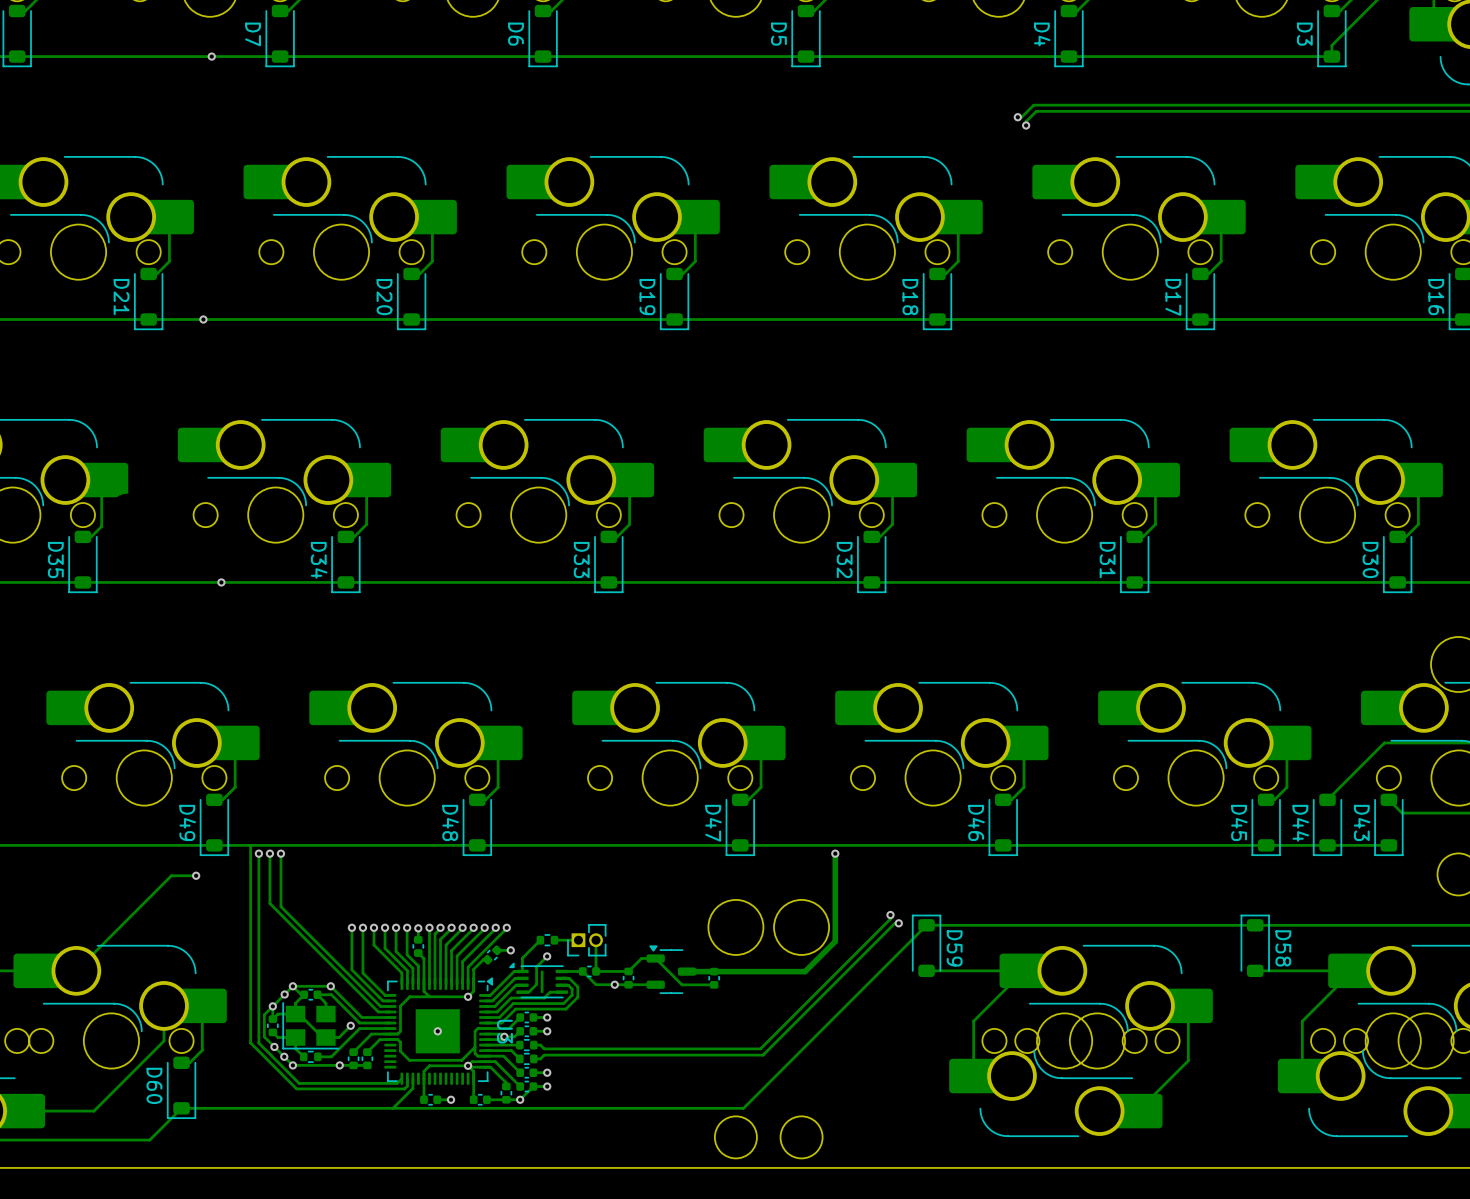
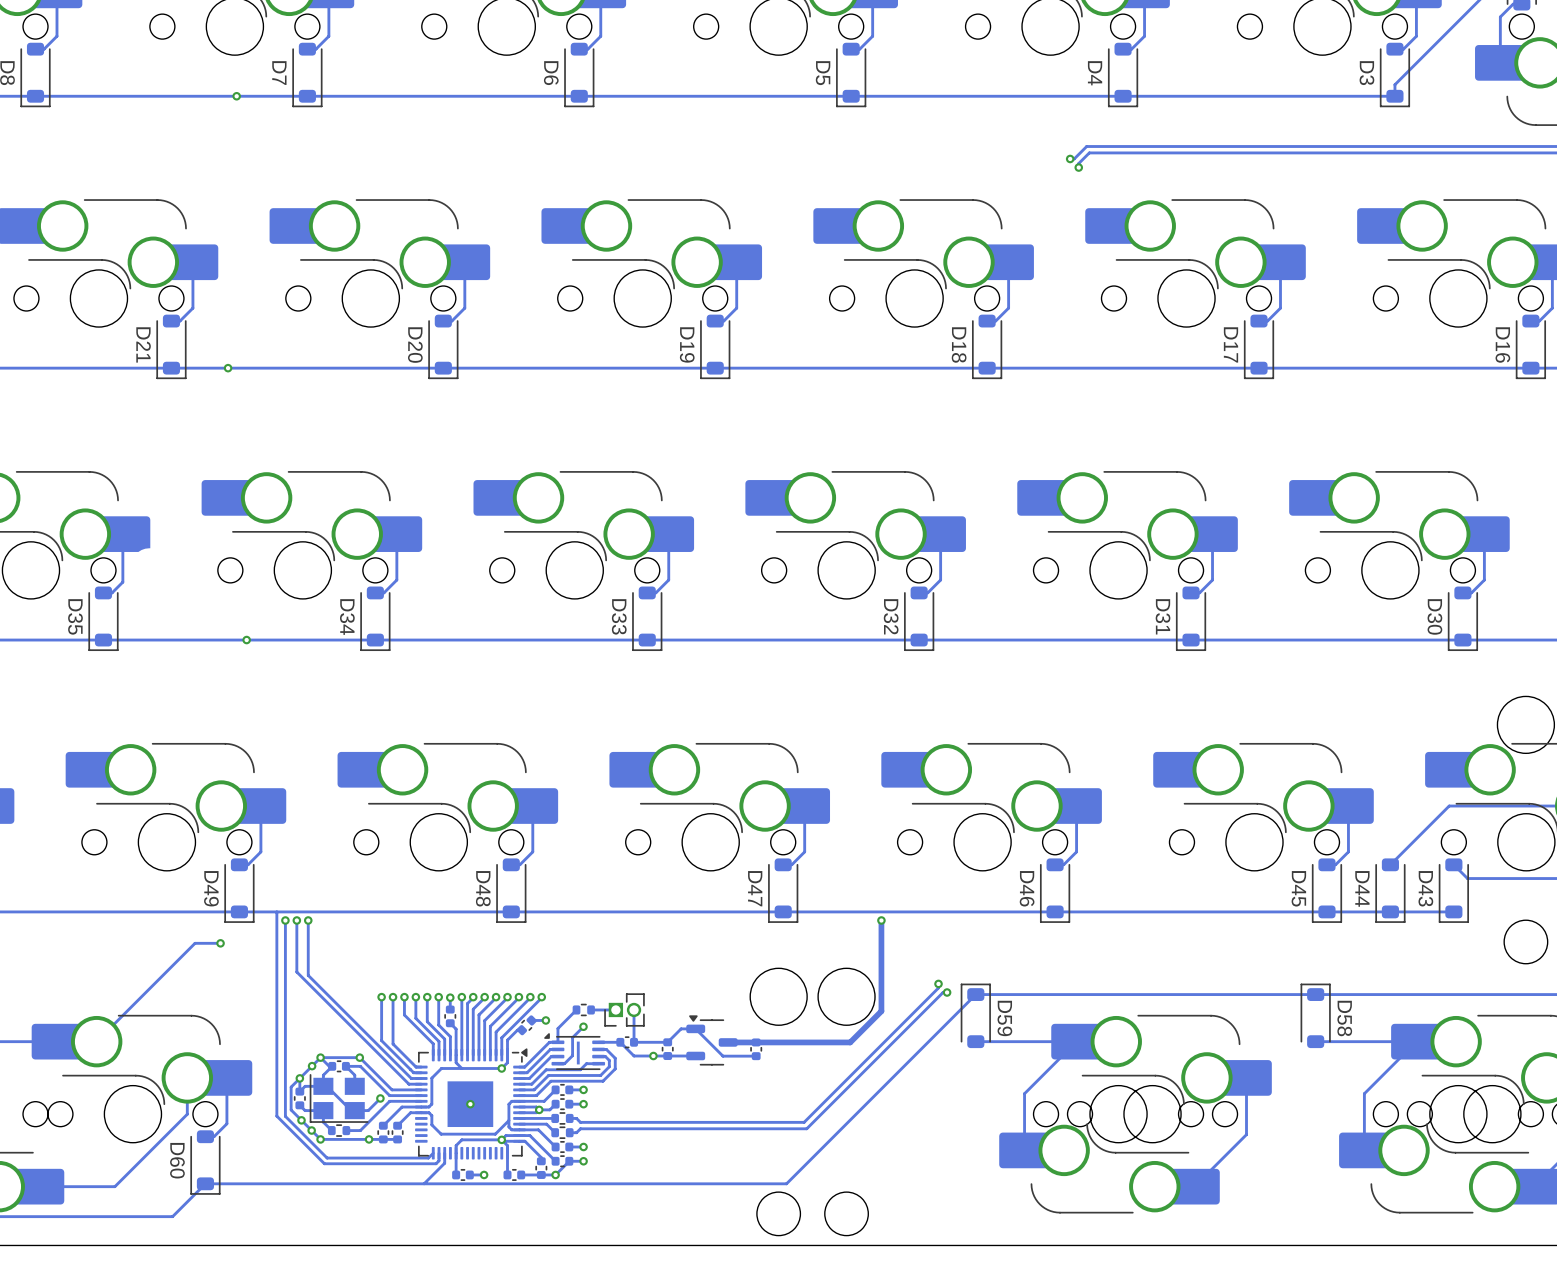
U3 name: U3 (504, 1031) -> none

